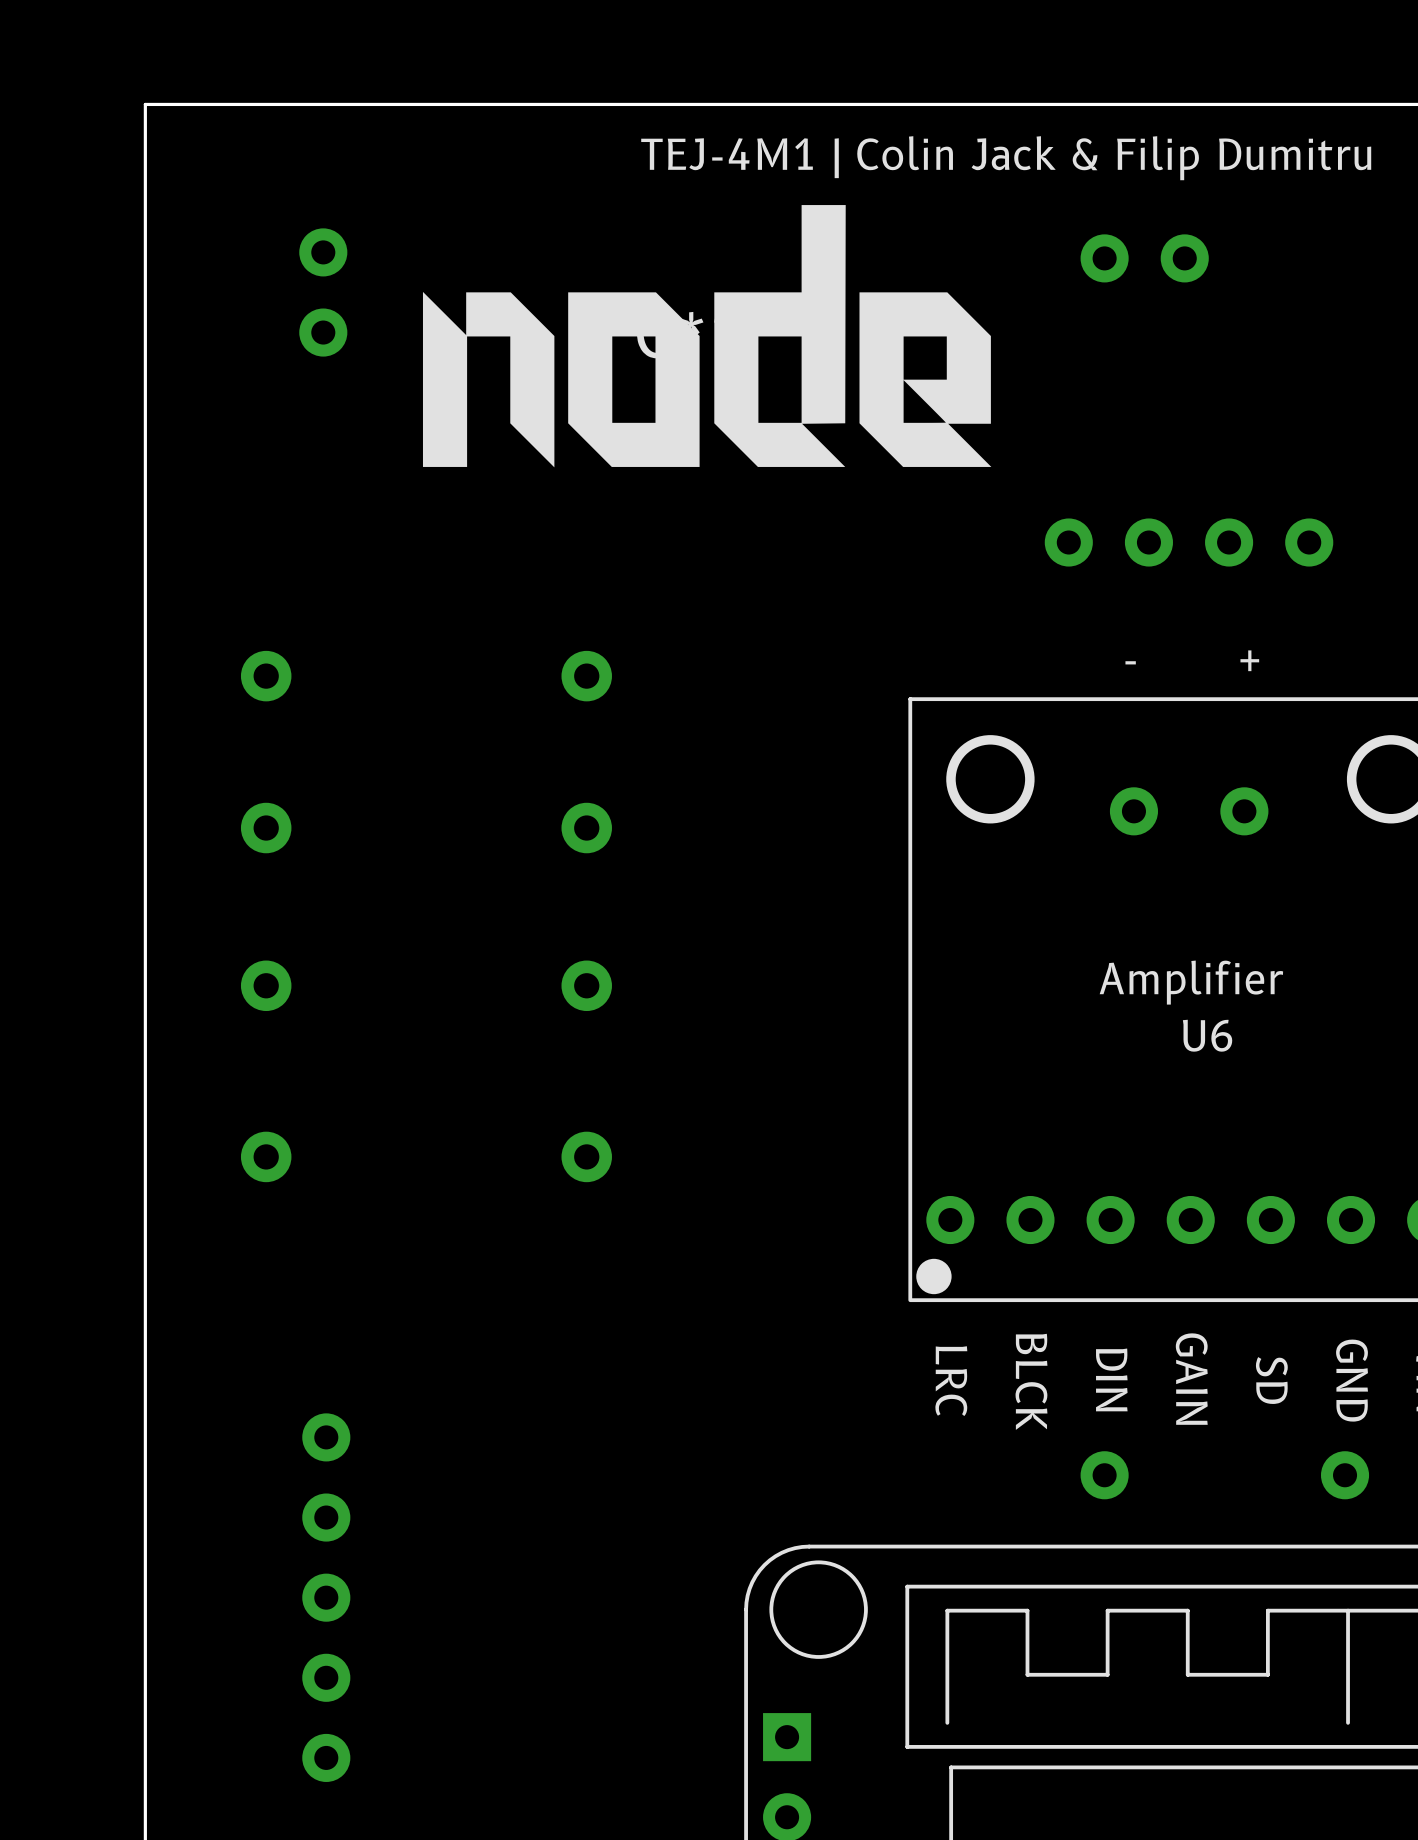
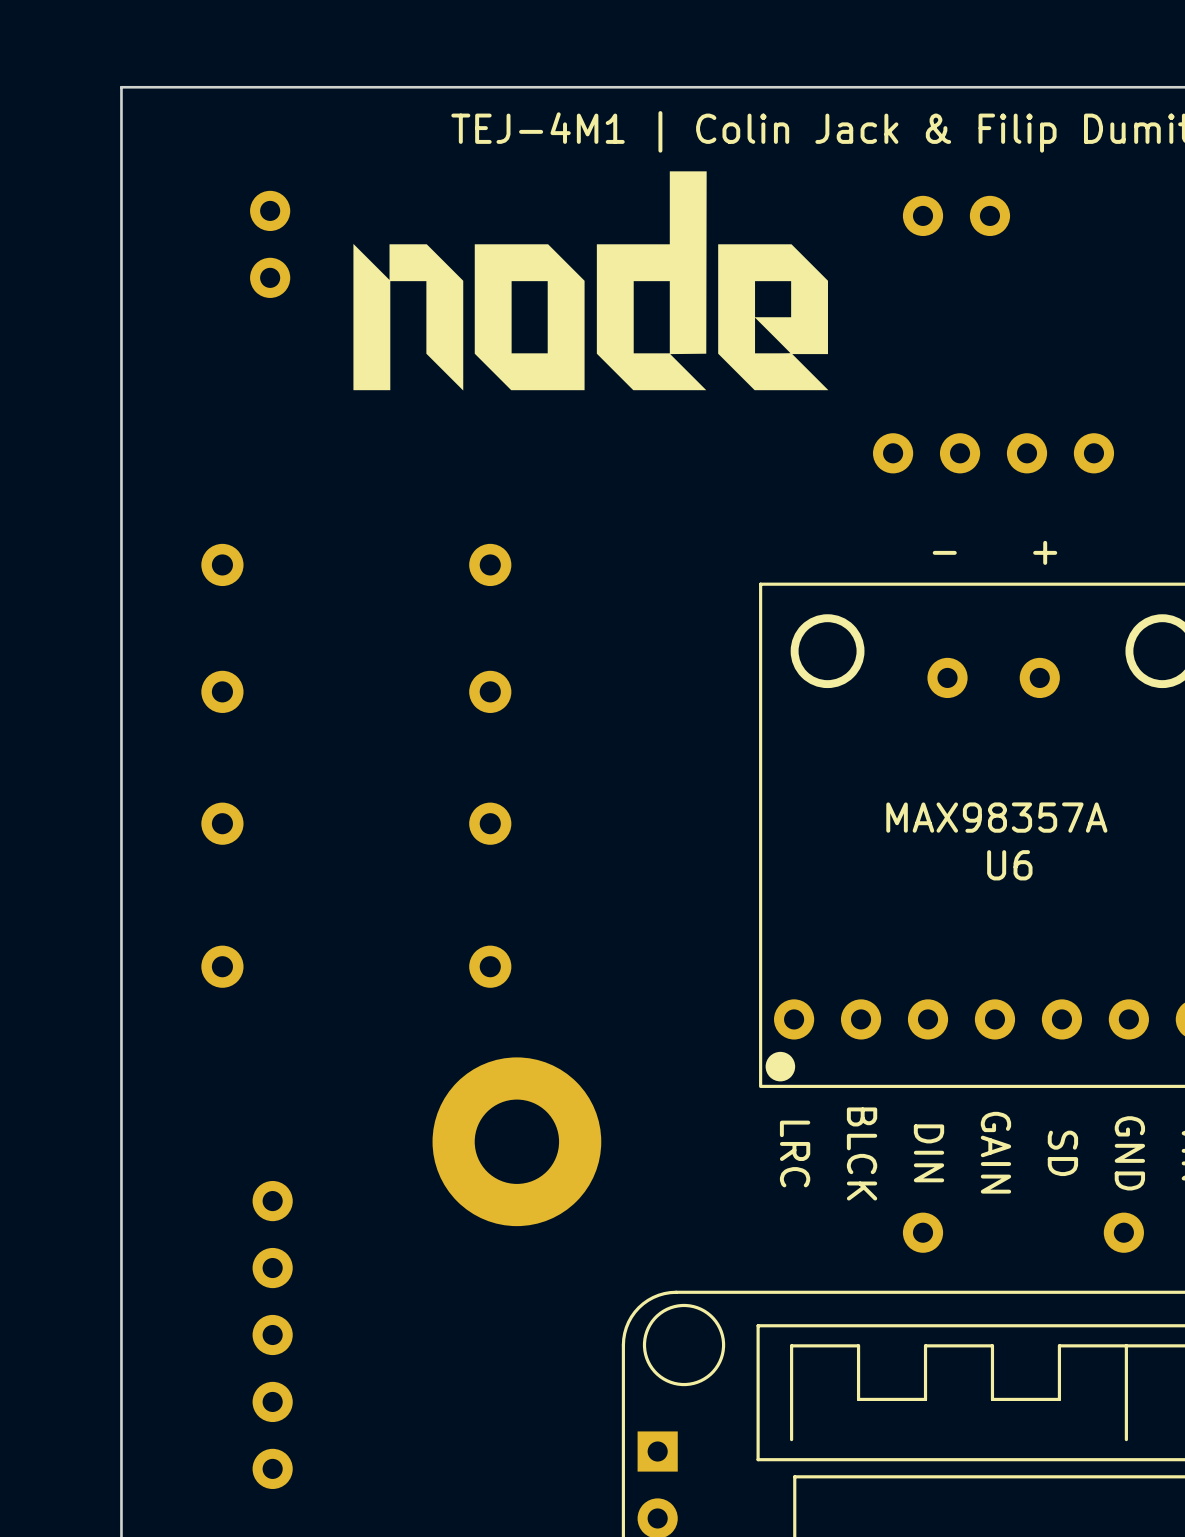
drawing: none -> [353, 171, 829, 391]
part: (707, 336) -> none
U6 text: Amplifier (1191, 982) -> MAX98357A (996, 817)
part: none -> (516, 1141)

